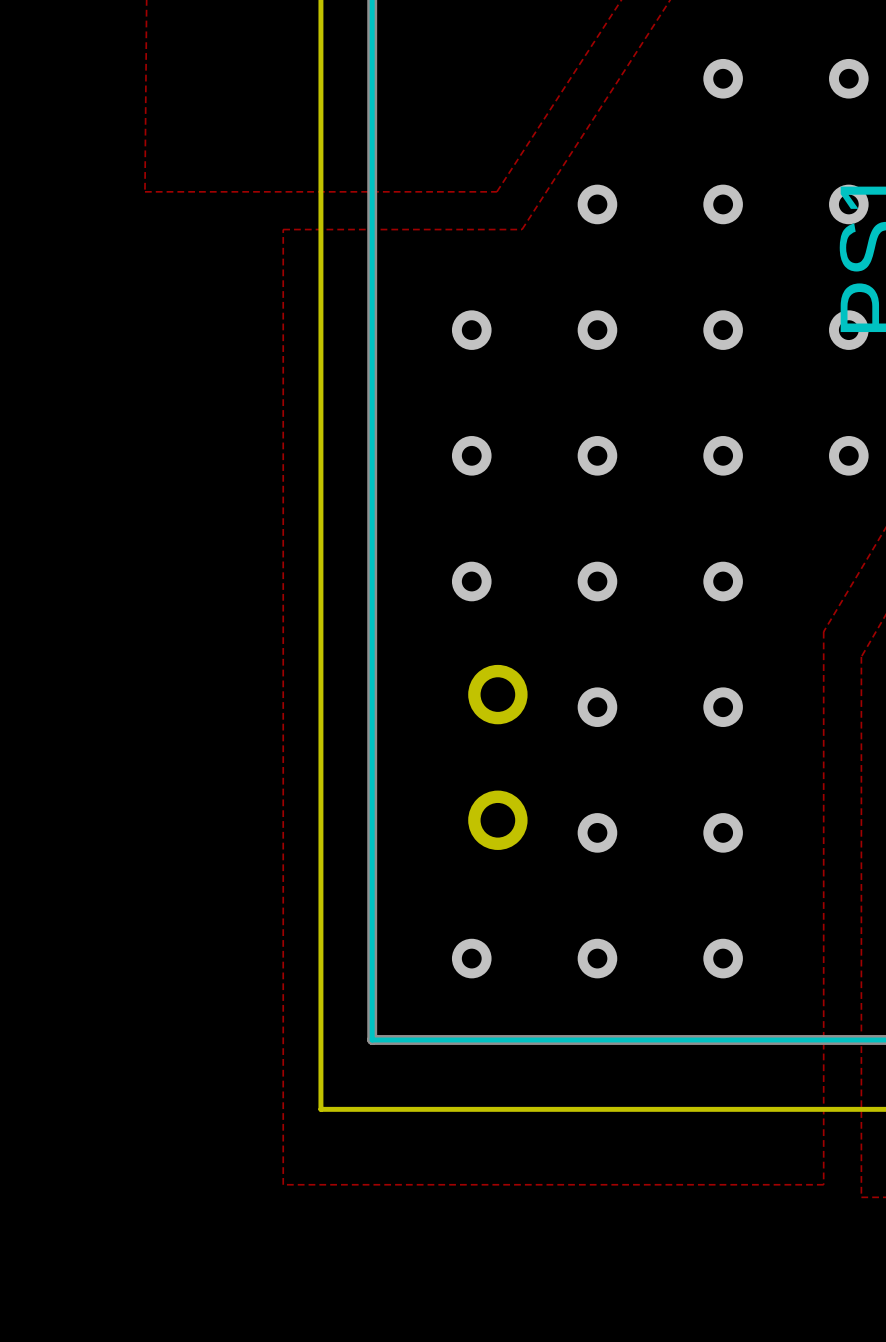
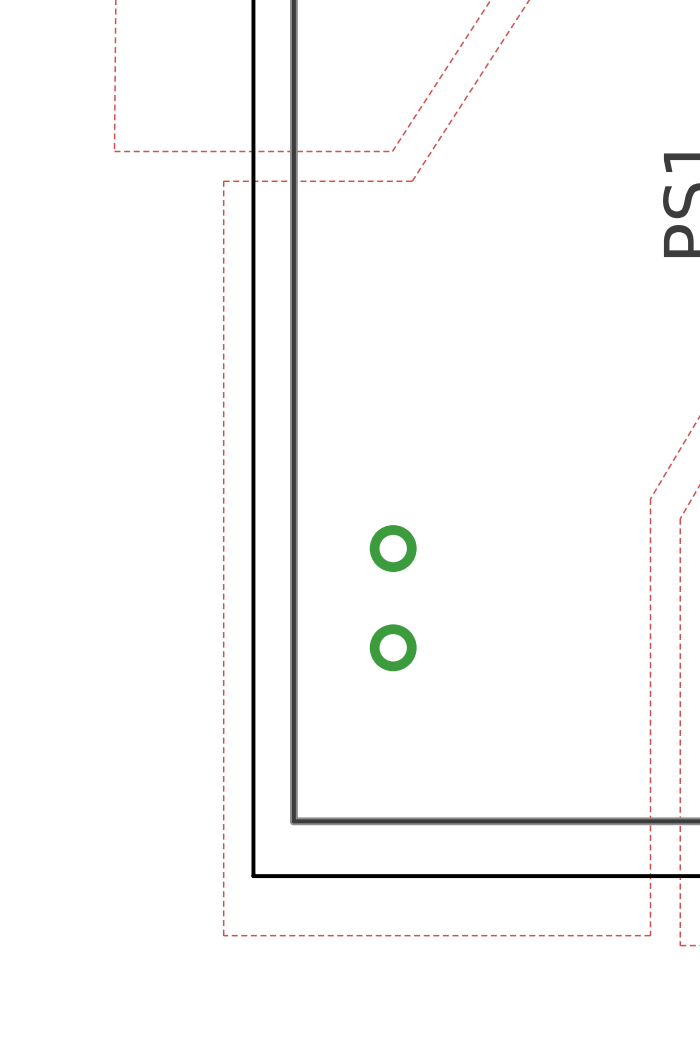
via: (723, 78) -> none
via: (848, 78) -> none
via: (597, 204) -> none
via: (723, 204) -> none
via: (848, 204) -> none
via: (471, 330) -> none
via: (597, 330) -> none
via: (723, 330) -> none
via: (848, 330) -> none
via: (471, 455) -> none
via: (597, 455) -> none
via: (723, 455) -> none
via: (848, 455) -> none
via: (471, 581) -> none
via: (597, 581) -> none
via: (723, 581) -> none
via: (597, 707) -> none
via: (723, 707) -> none
via: (597, 832) -> none
via: (723, 832) -> none
via: (471, 958) -> none
via: (597, 958) -> none
via: (723, 958) -> none

